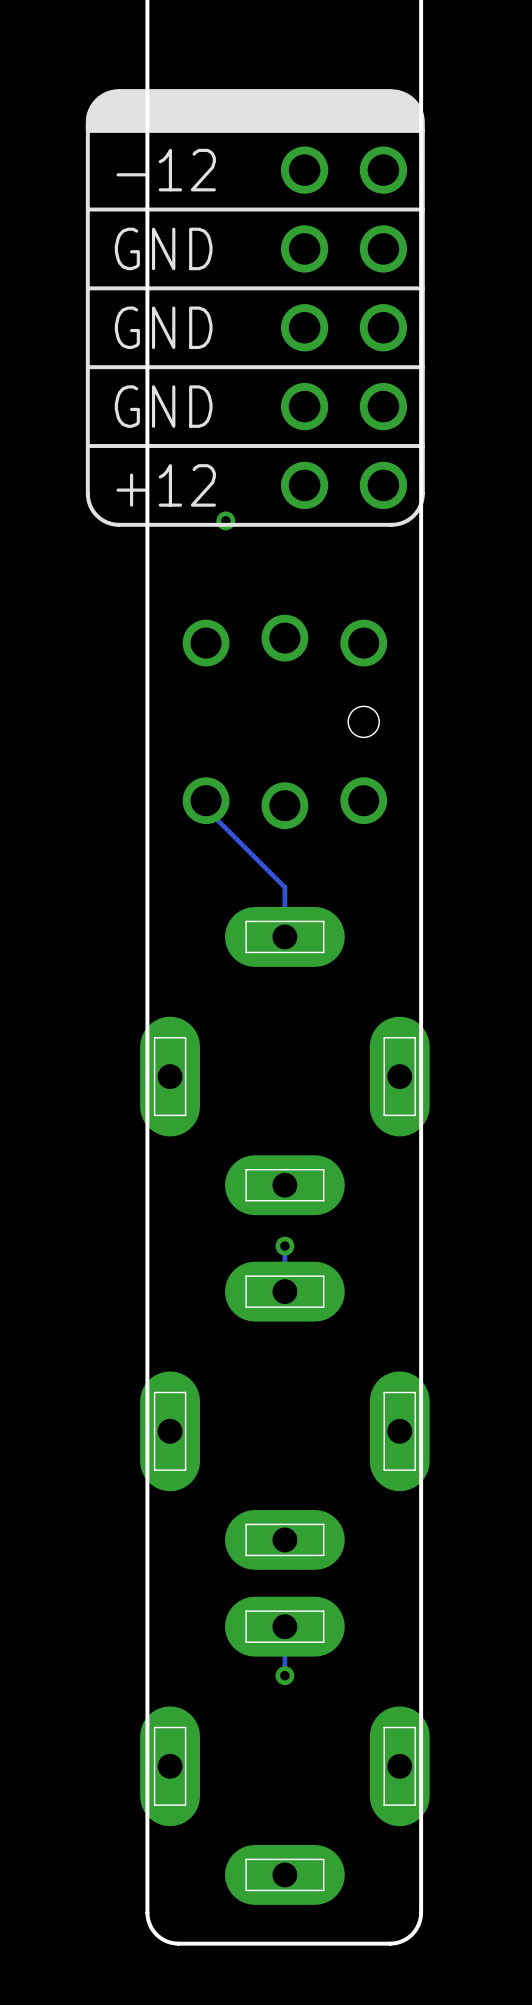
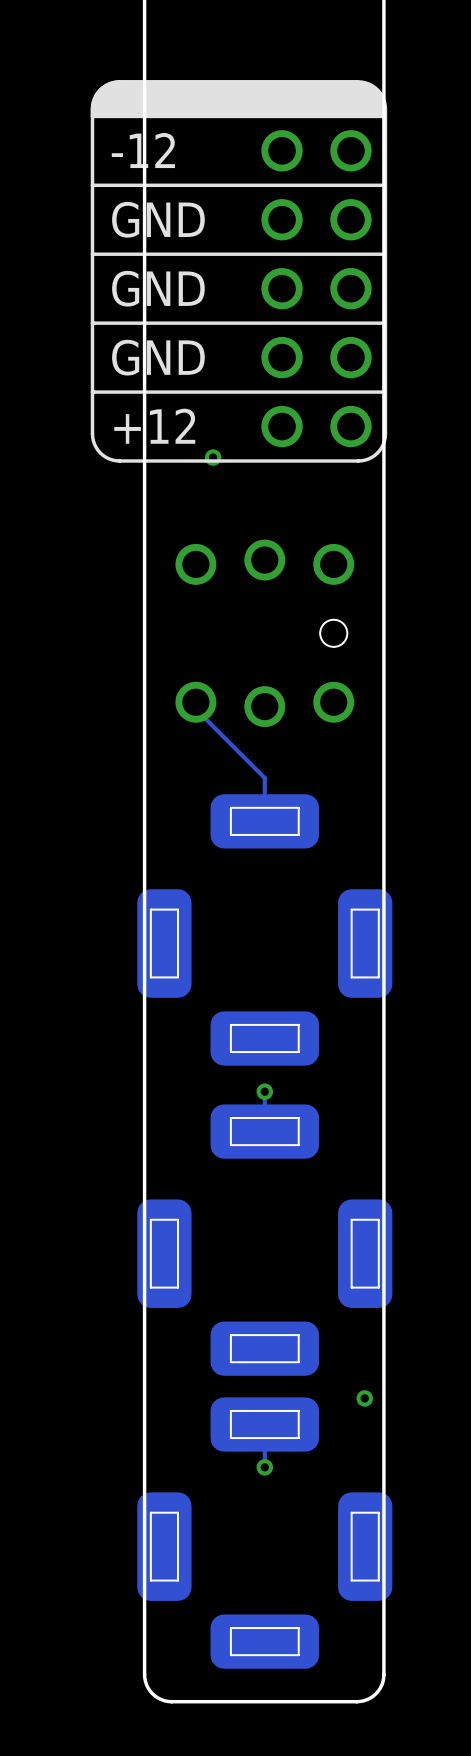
part footprint: [140, 906, 430, 1216] -> [137, 794, 393, 1066]
part footprint: [140, 1261, 430, 1570] -> [137, 1104, 393, 1376]
part footprint: [140, 1596, 430, 1905] -> [137, 1397, 393, 1669]
via: none -> (364, 1398)

